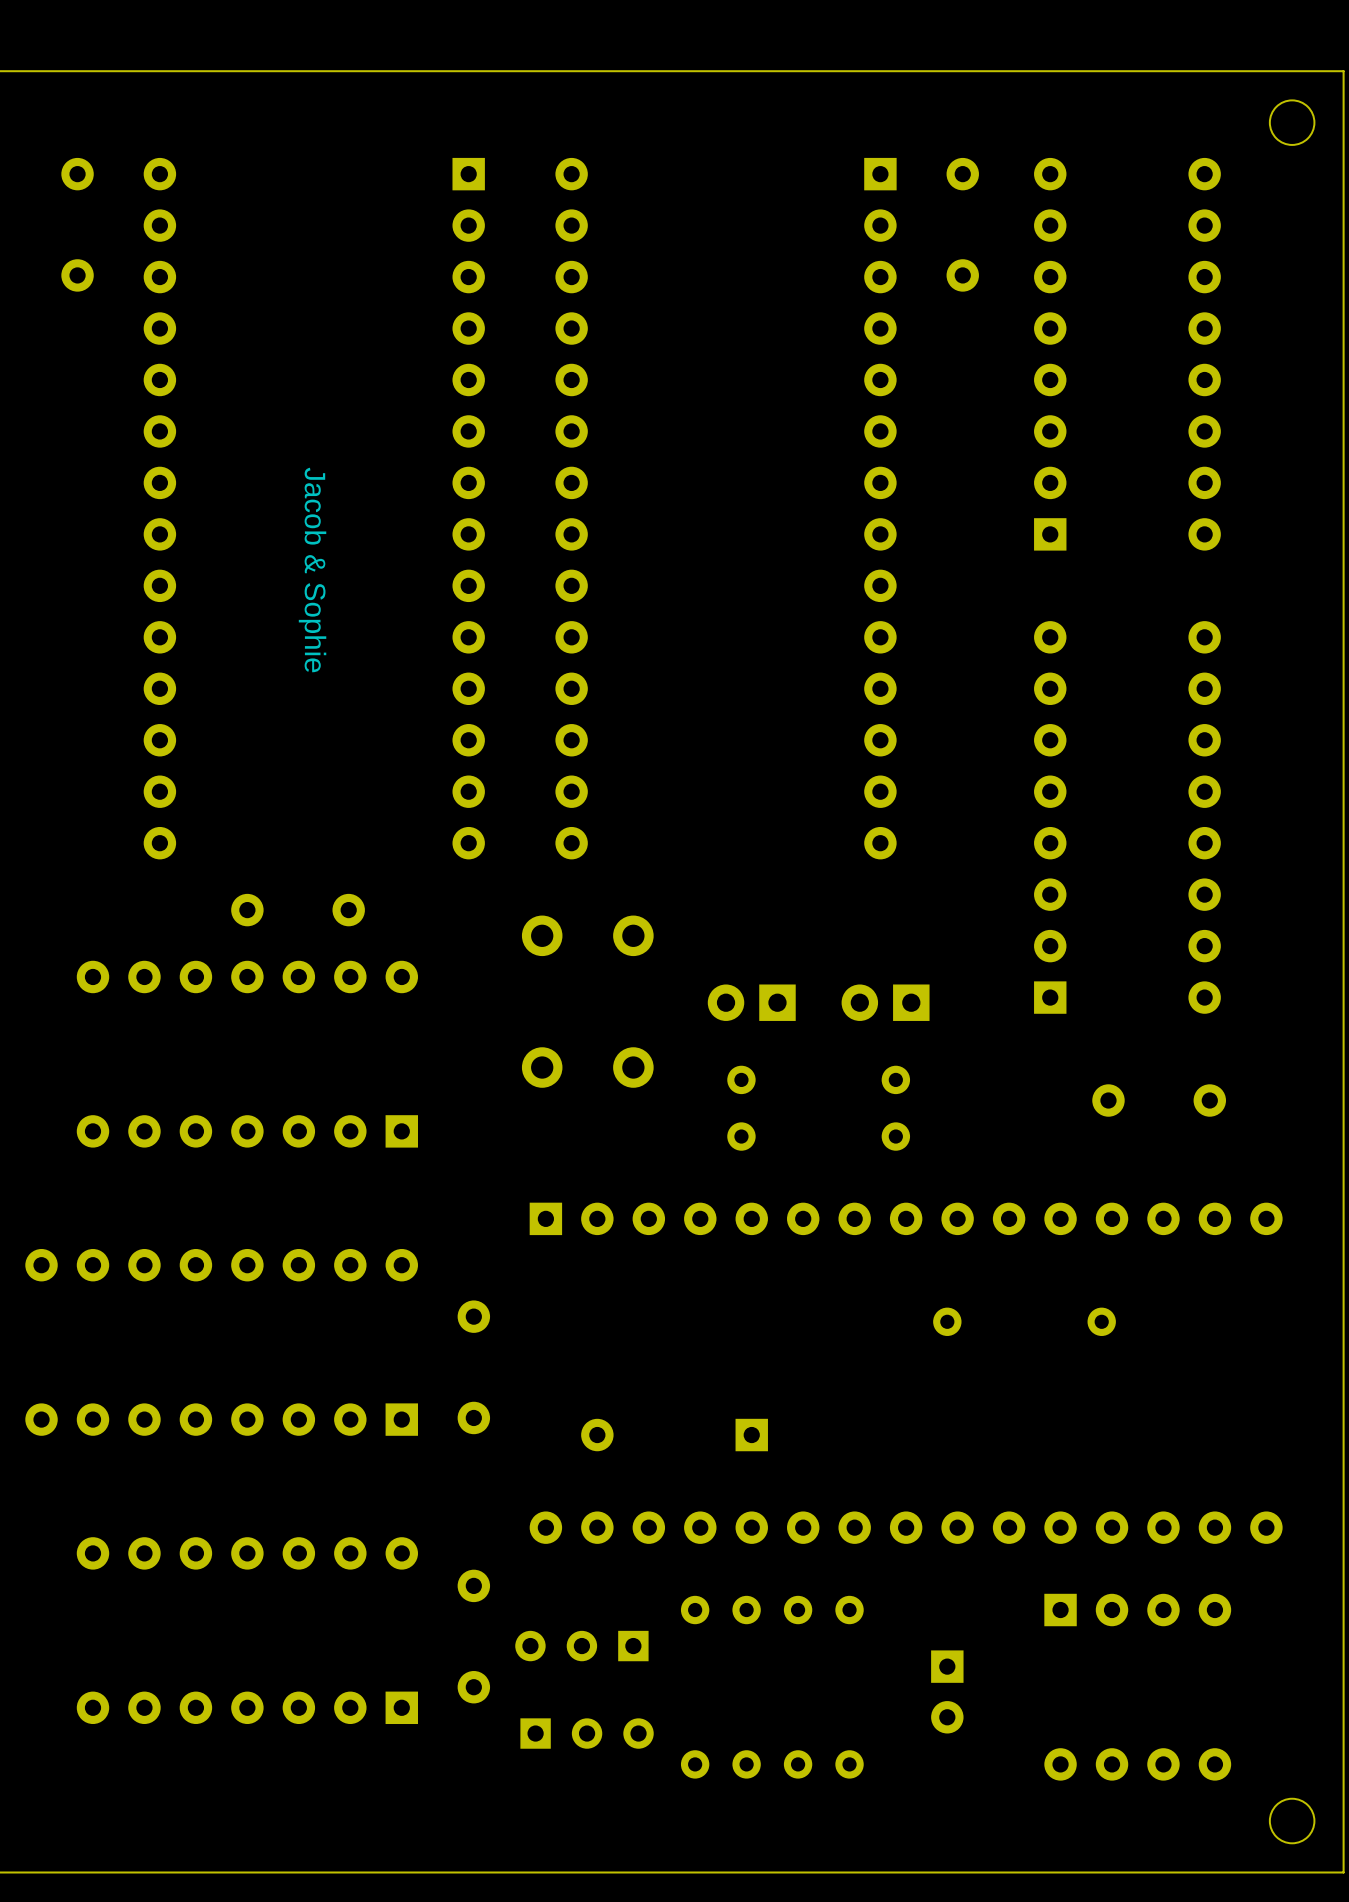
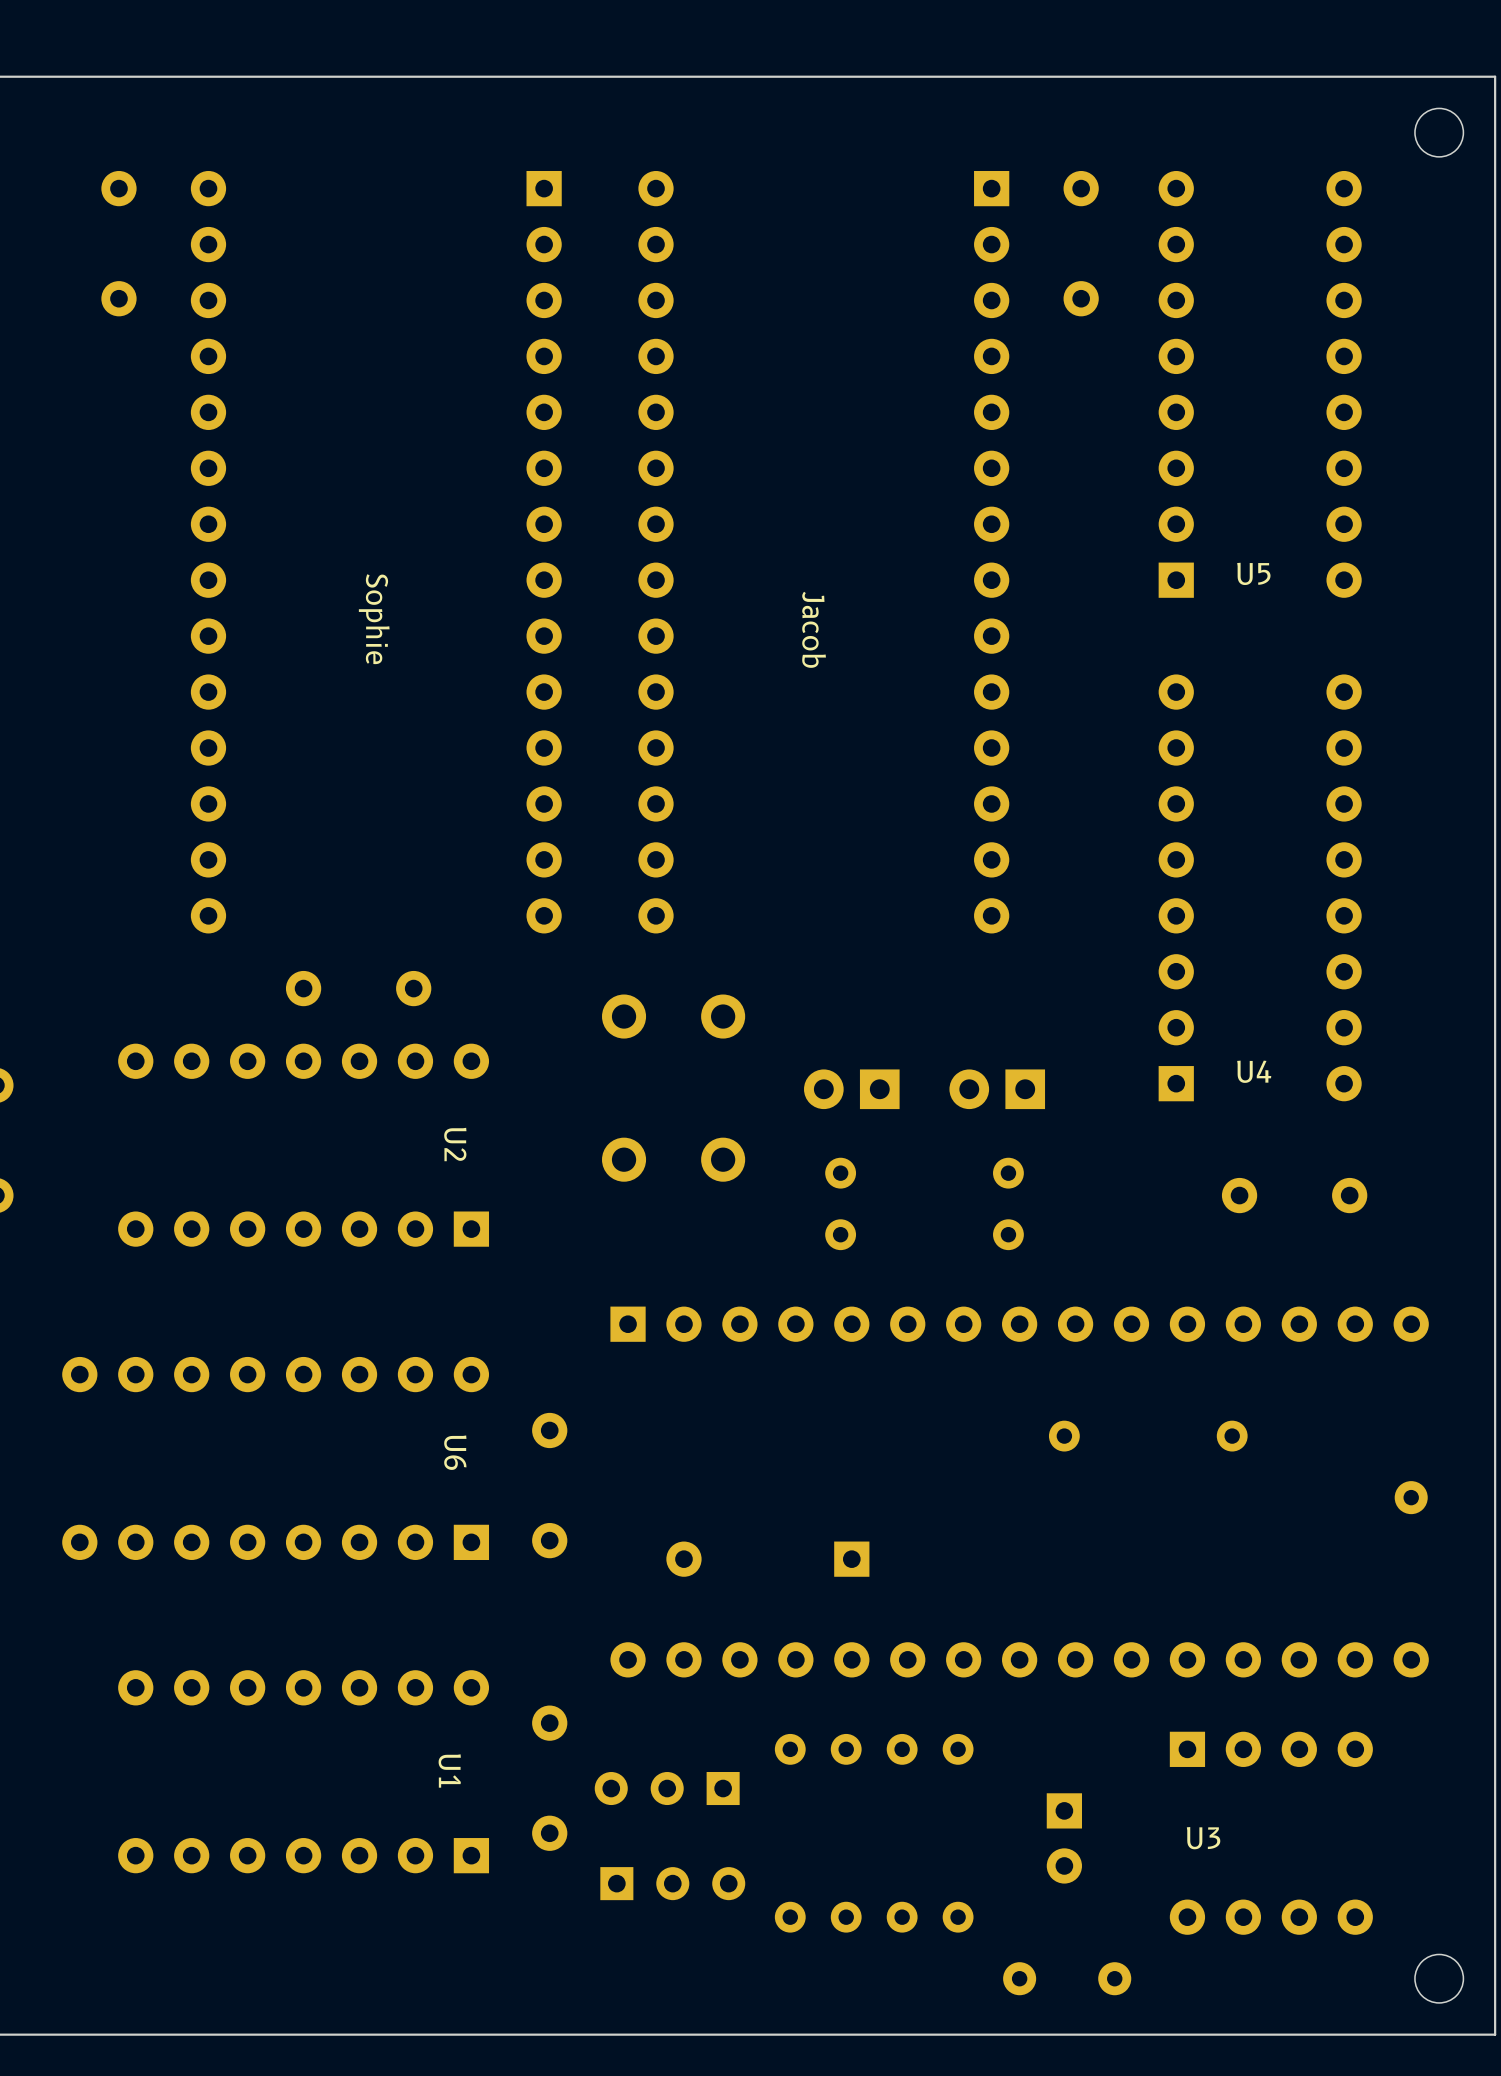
text: none -> U5 (1253, 573)
text: Jacob & Sophie (312, 569) -> Sophie (374, 619)
text: none -> Jacob (814, 629)
text: none -> U4 (1254, 1071)
text: none -> U2 (455, 1144)
text: none -> U6 (455, 1452)
part: none -> (1411, 1497)
text: none -> U1 (449, 1771)
text: none -> U3 (1203, 1838)
part: none -> (1019, 1978)
part: none -> (1114, 1978)

